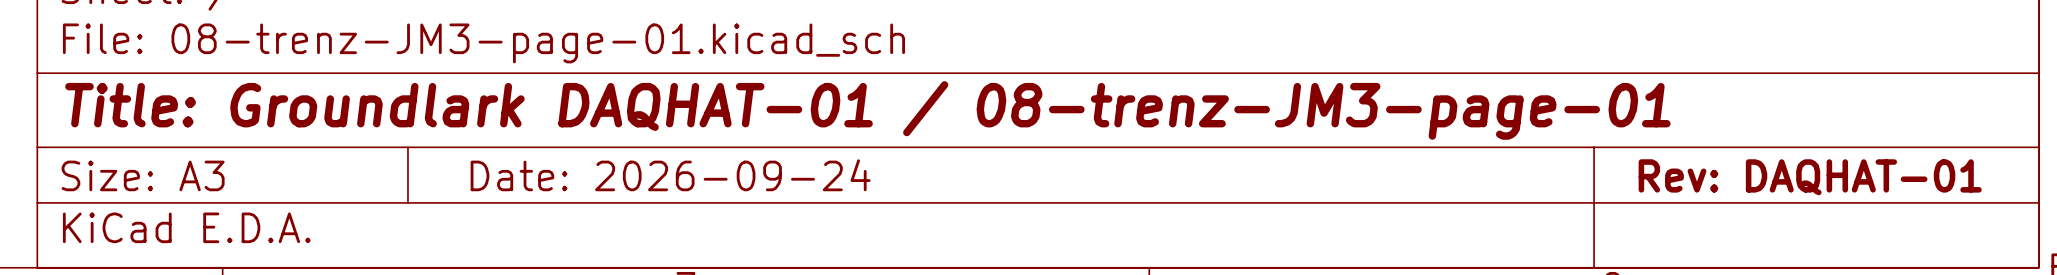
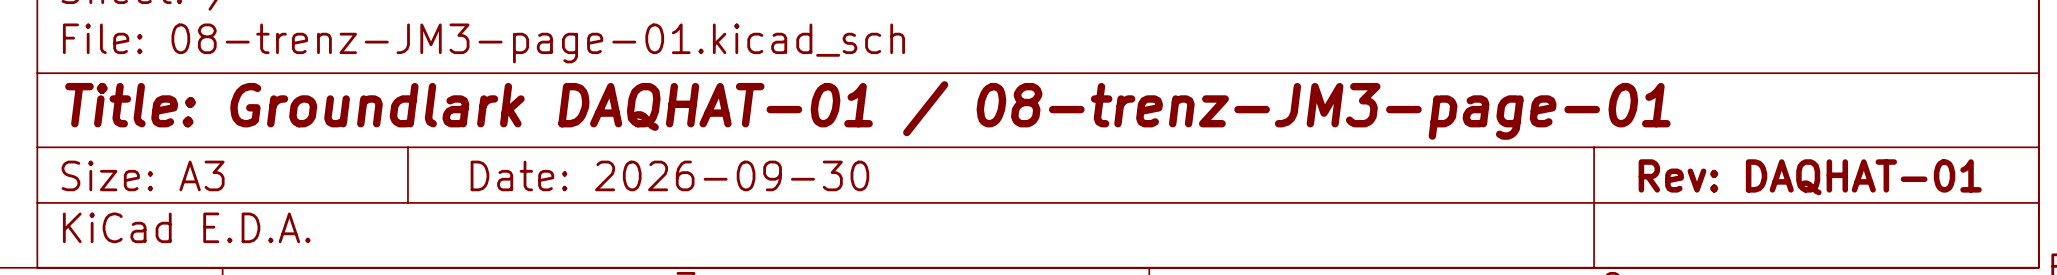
title block: Date: 2026-09-24 (670, 175) -> Date: 2026-09-30 (669, 175)

